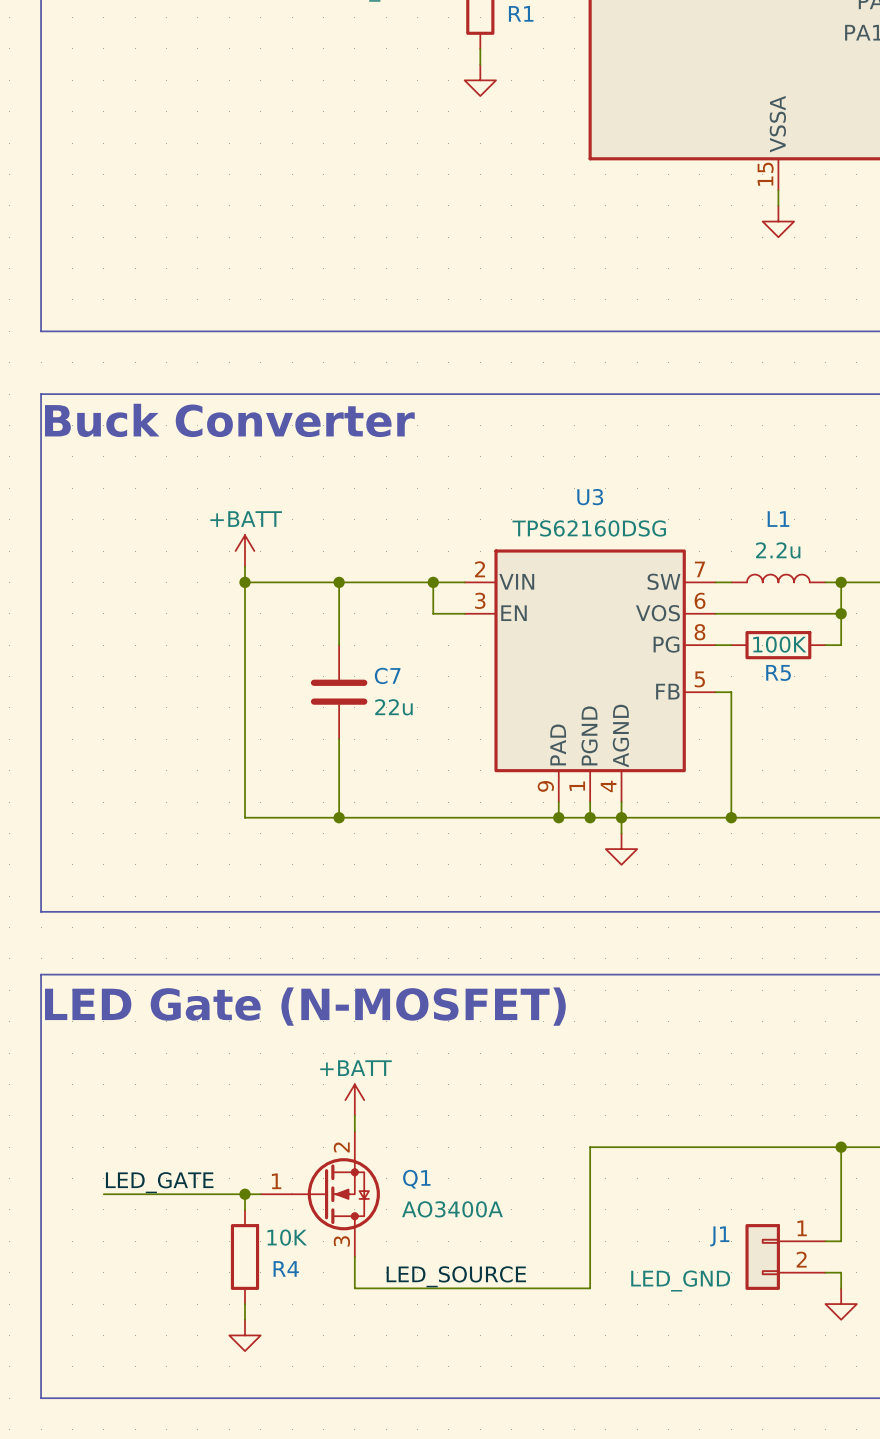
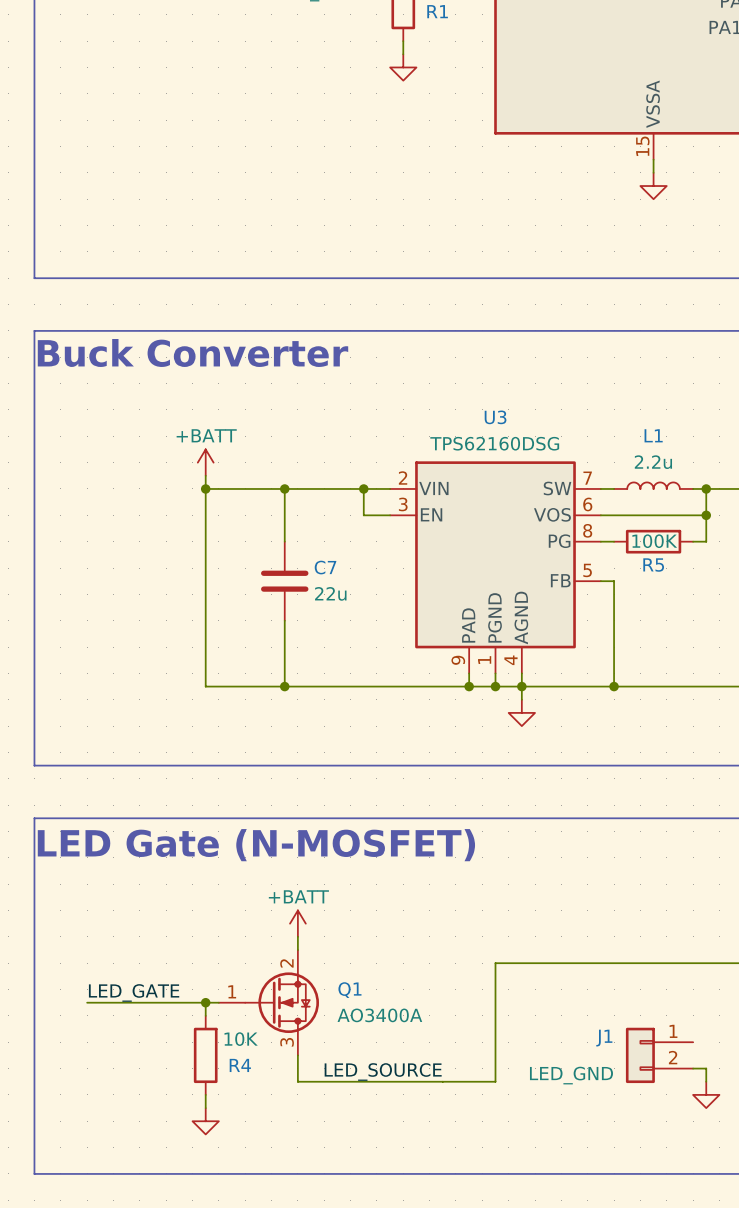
wire: (841, 1147) (841, 1241) (825, 1241) -> none
junction: (841, 1147) -> none

